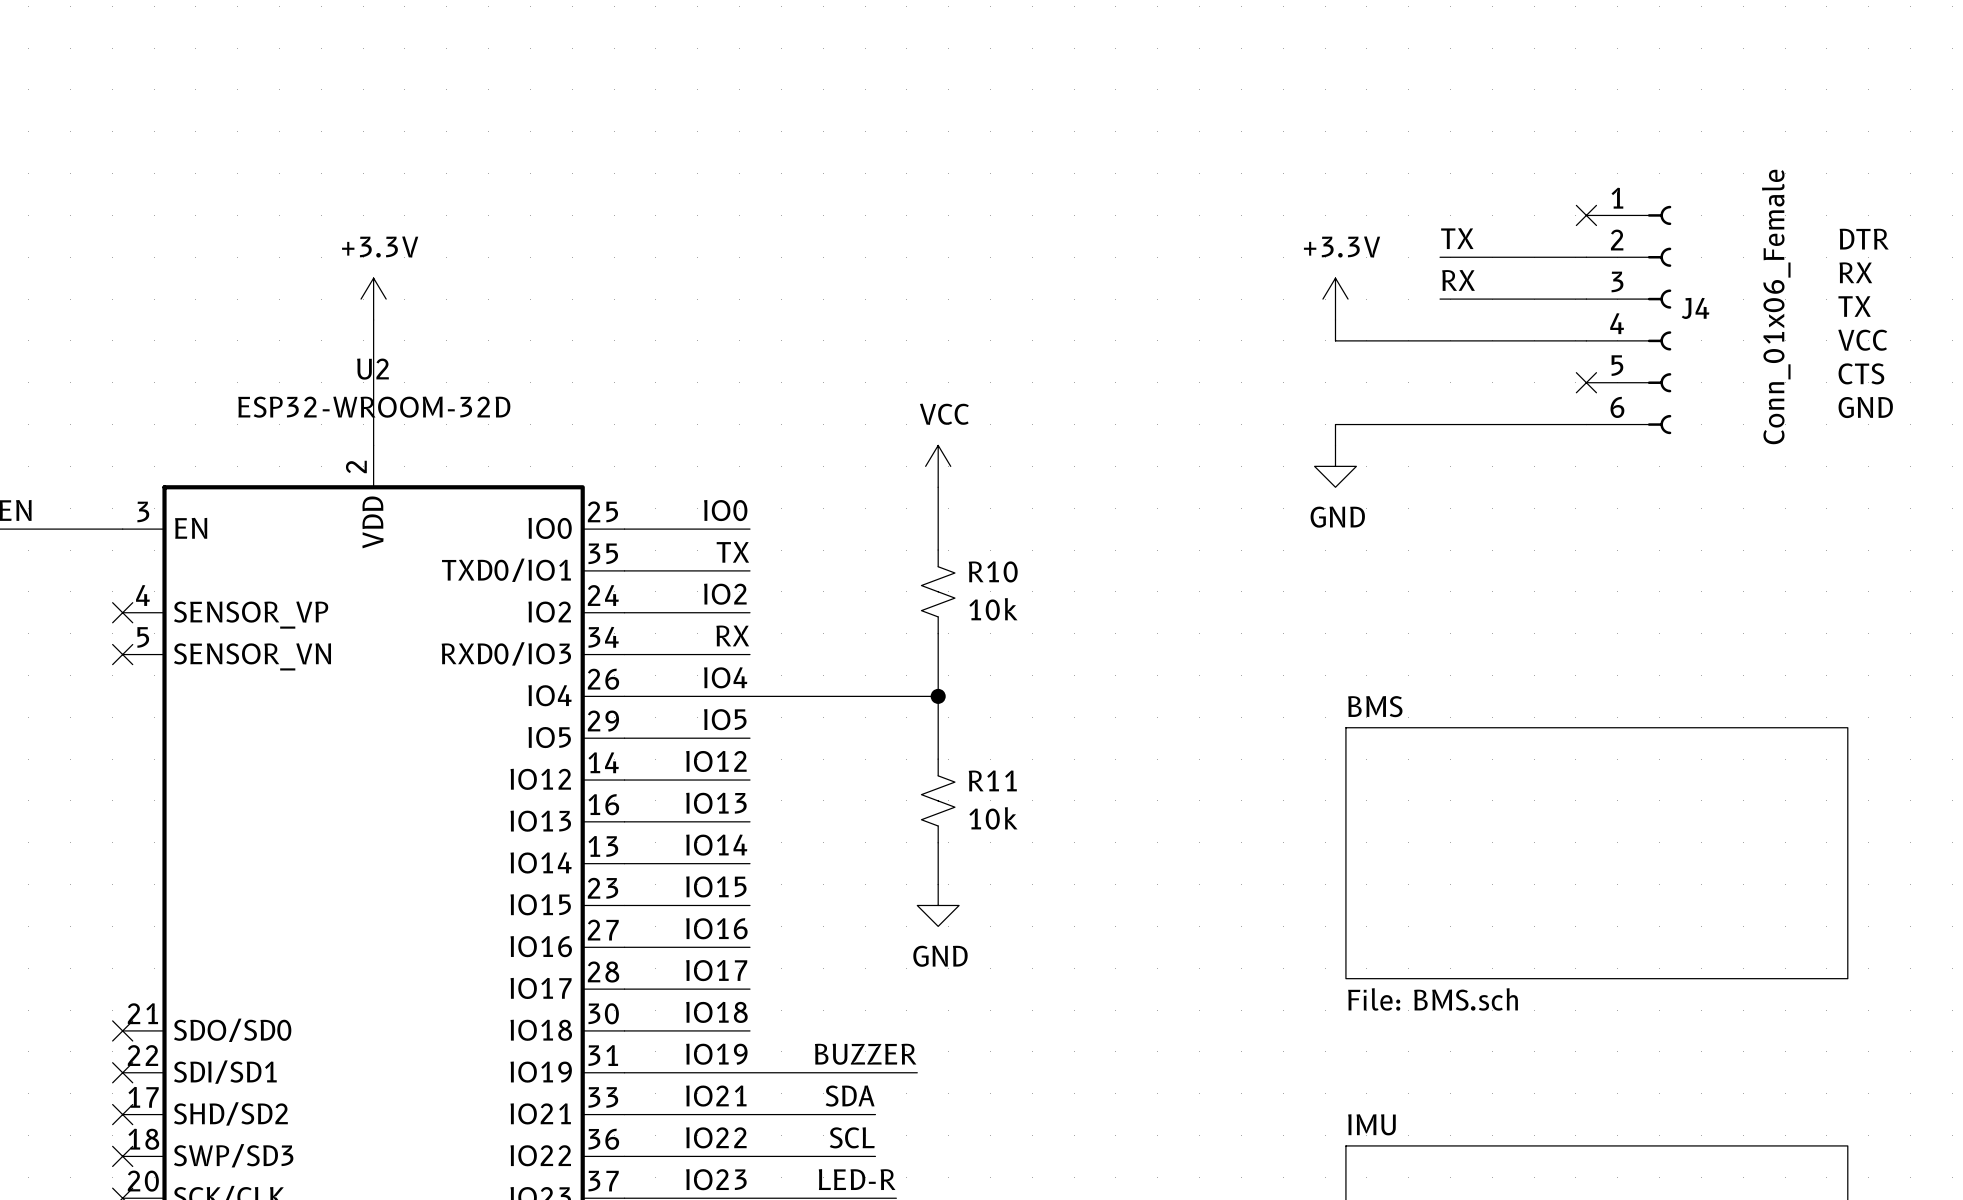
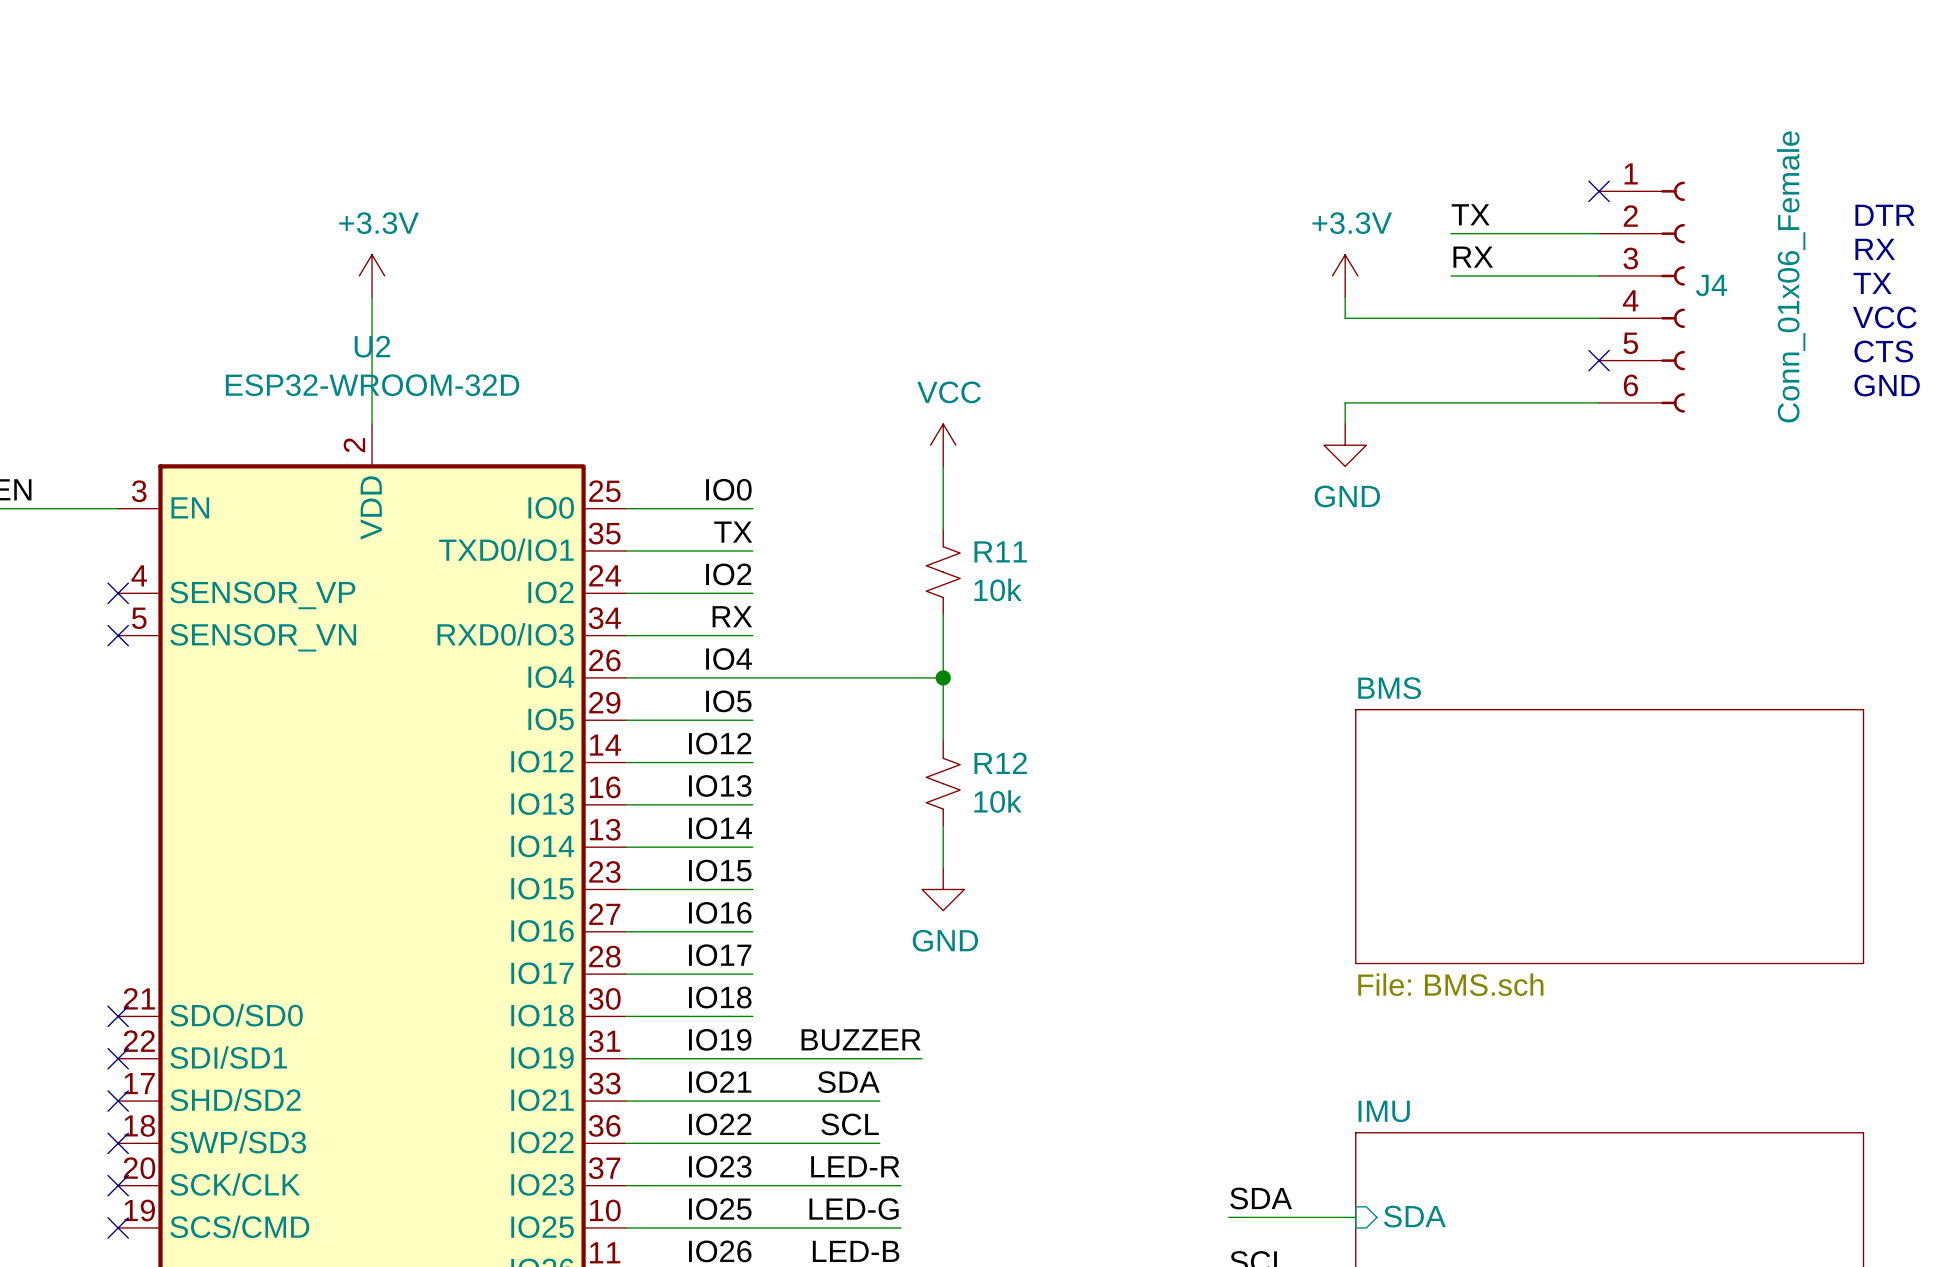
R10 name: R10 (993, 571) -> R11 (1000, 551)
R11 name: R11 (992, 780) -> R12 (1000, 763)

